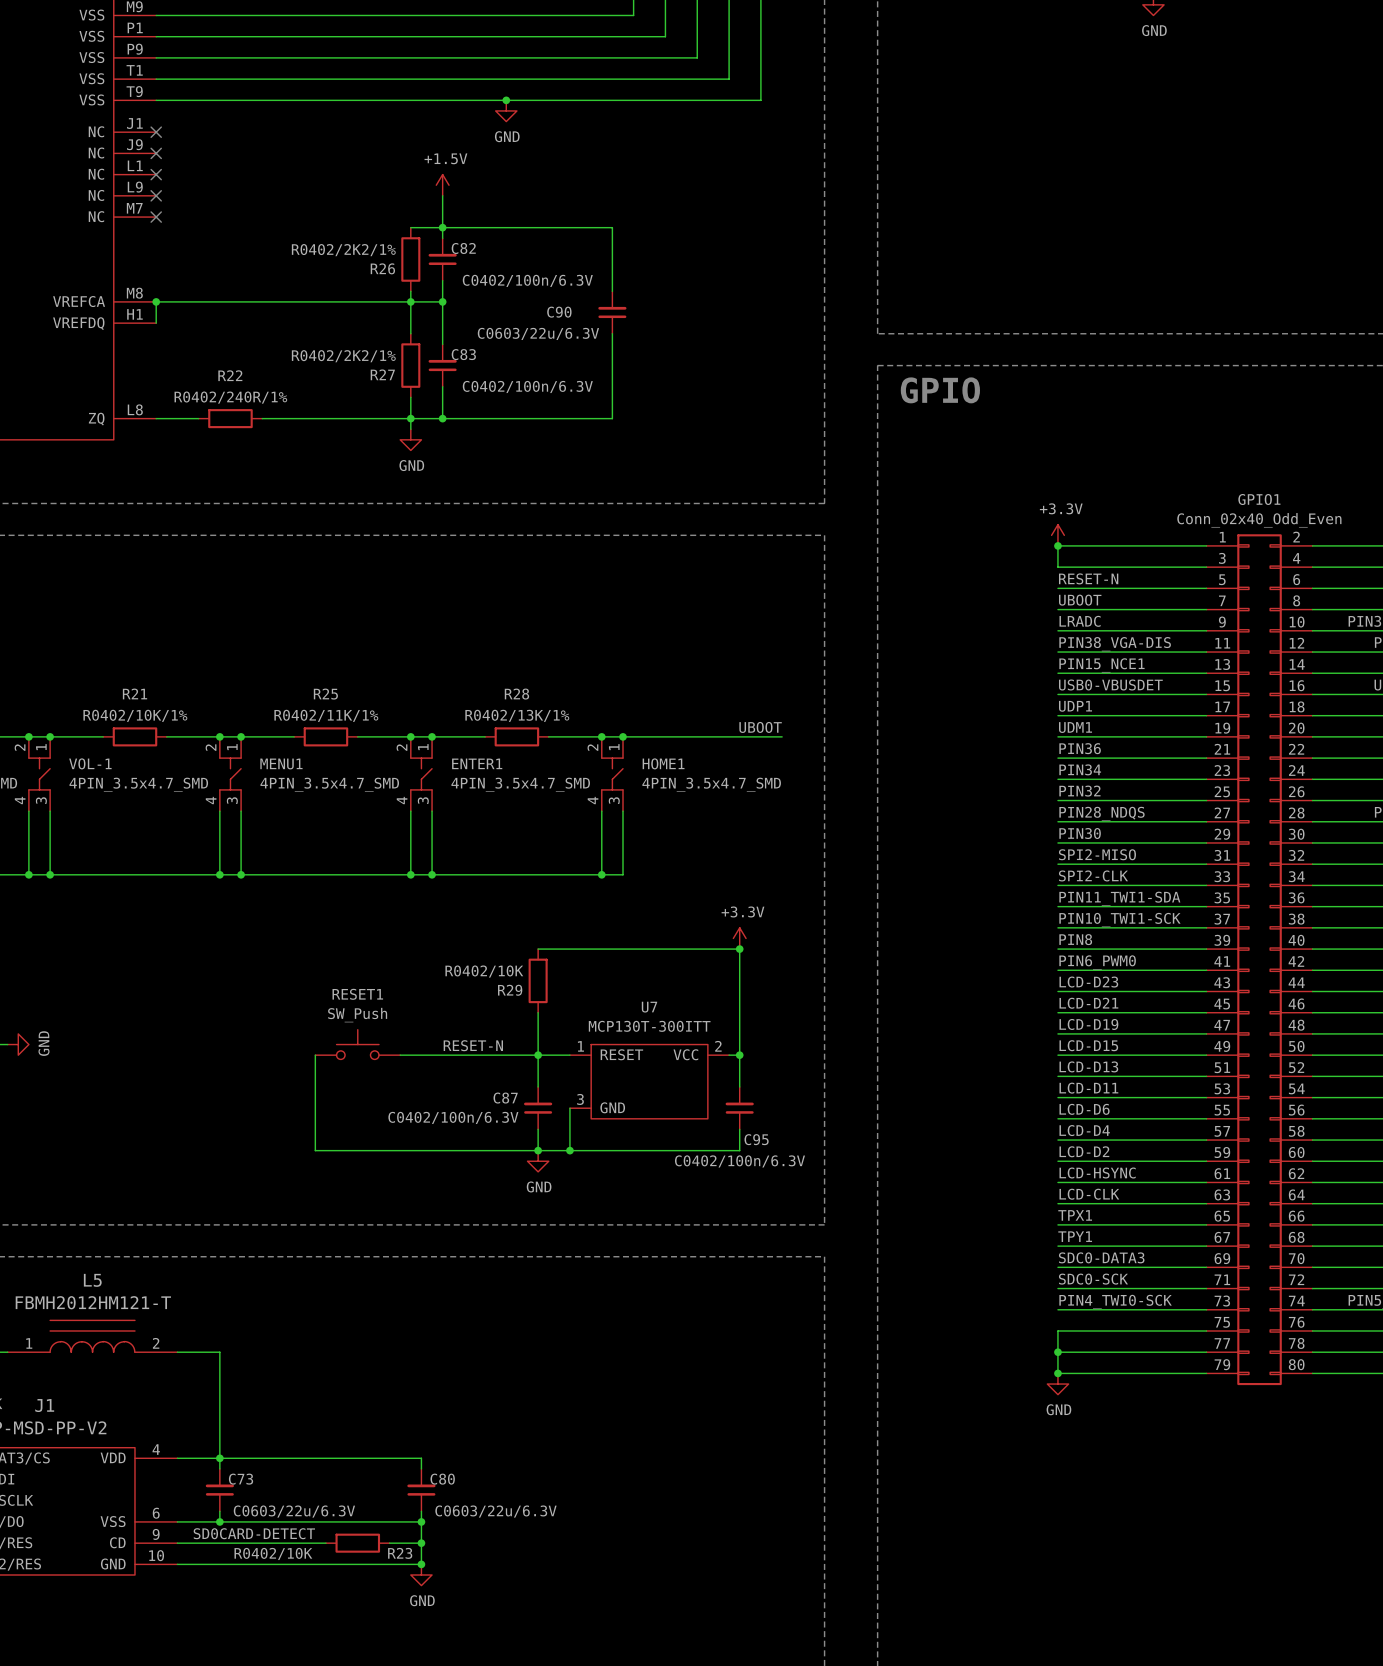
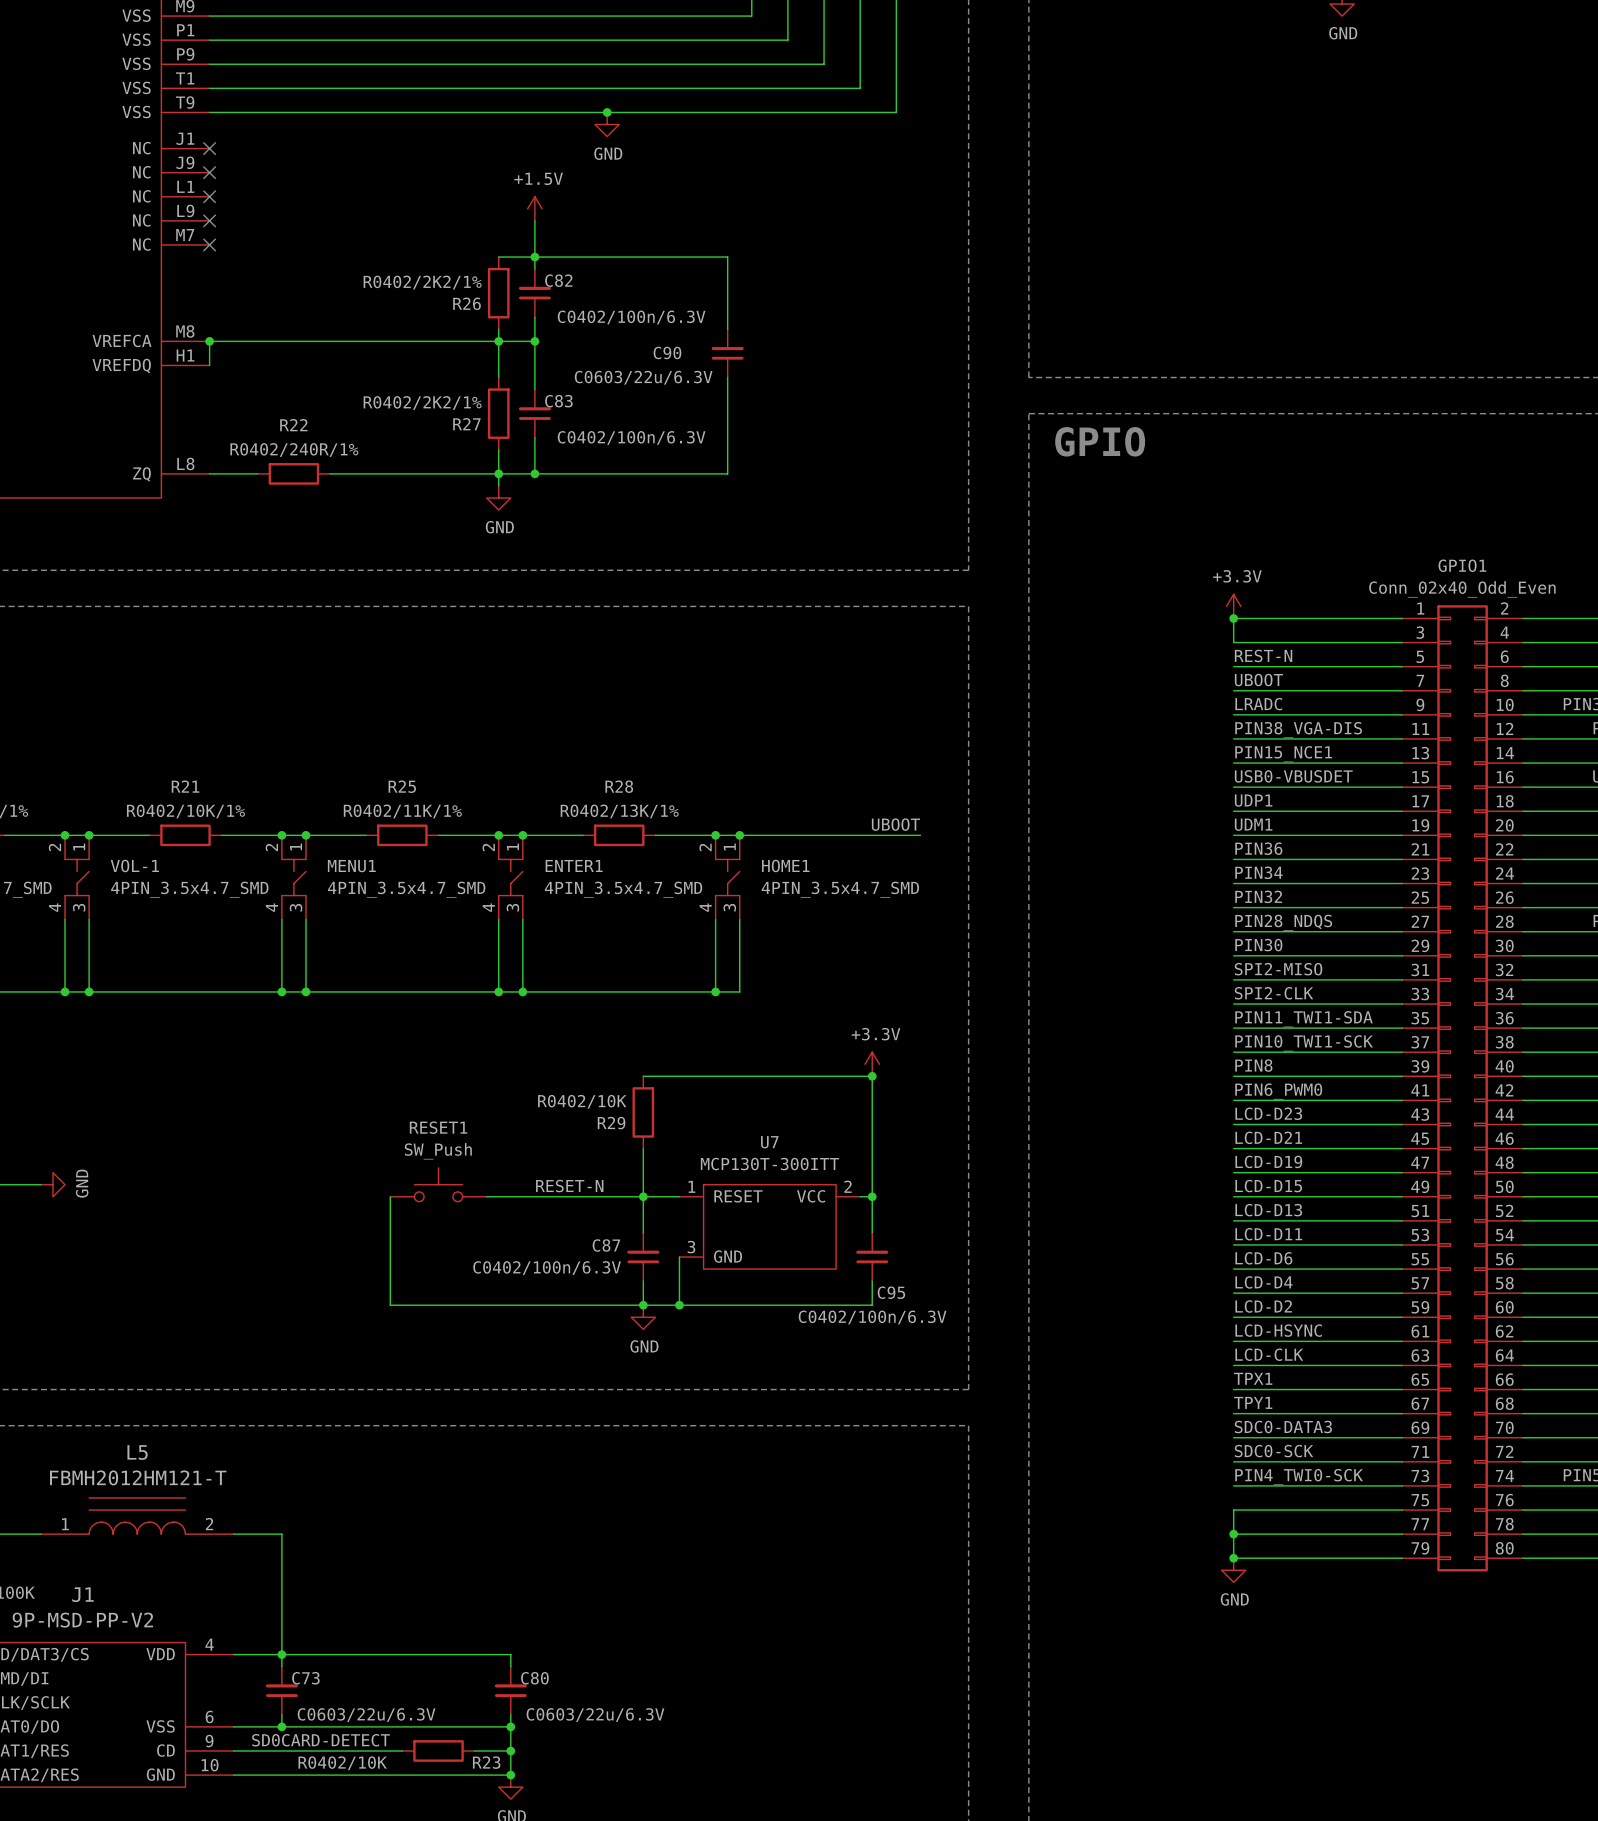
label: RESET-N (1088, 578) -> REST-N (1263, 655)

